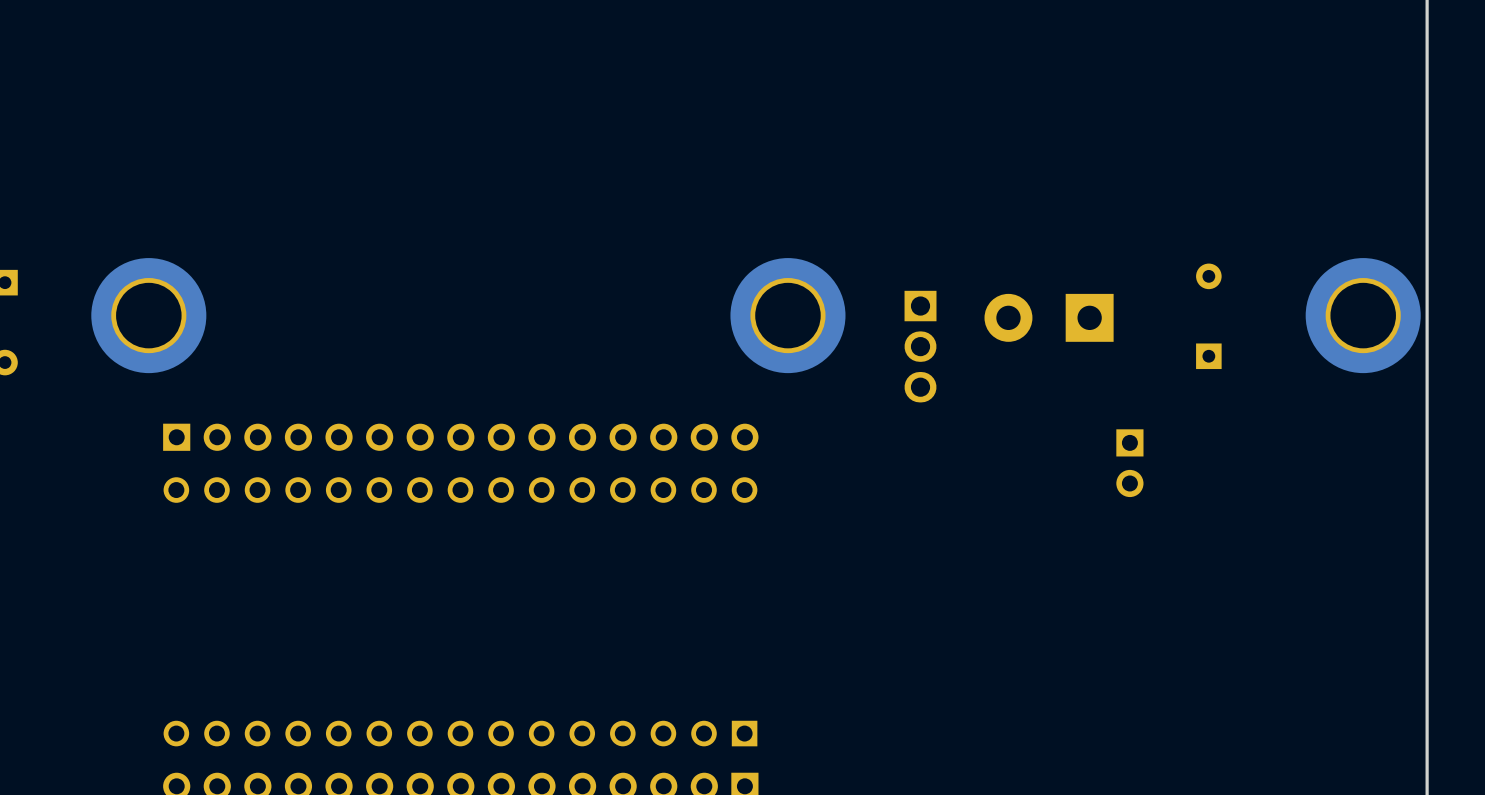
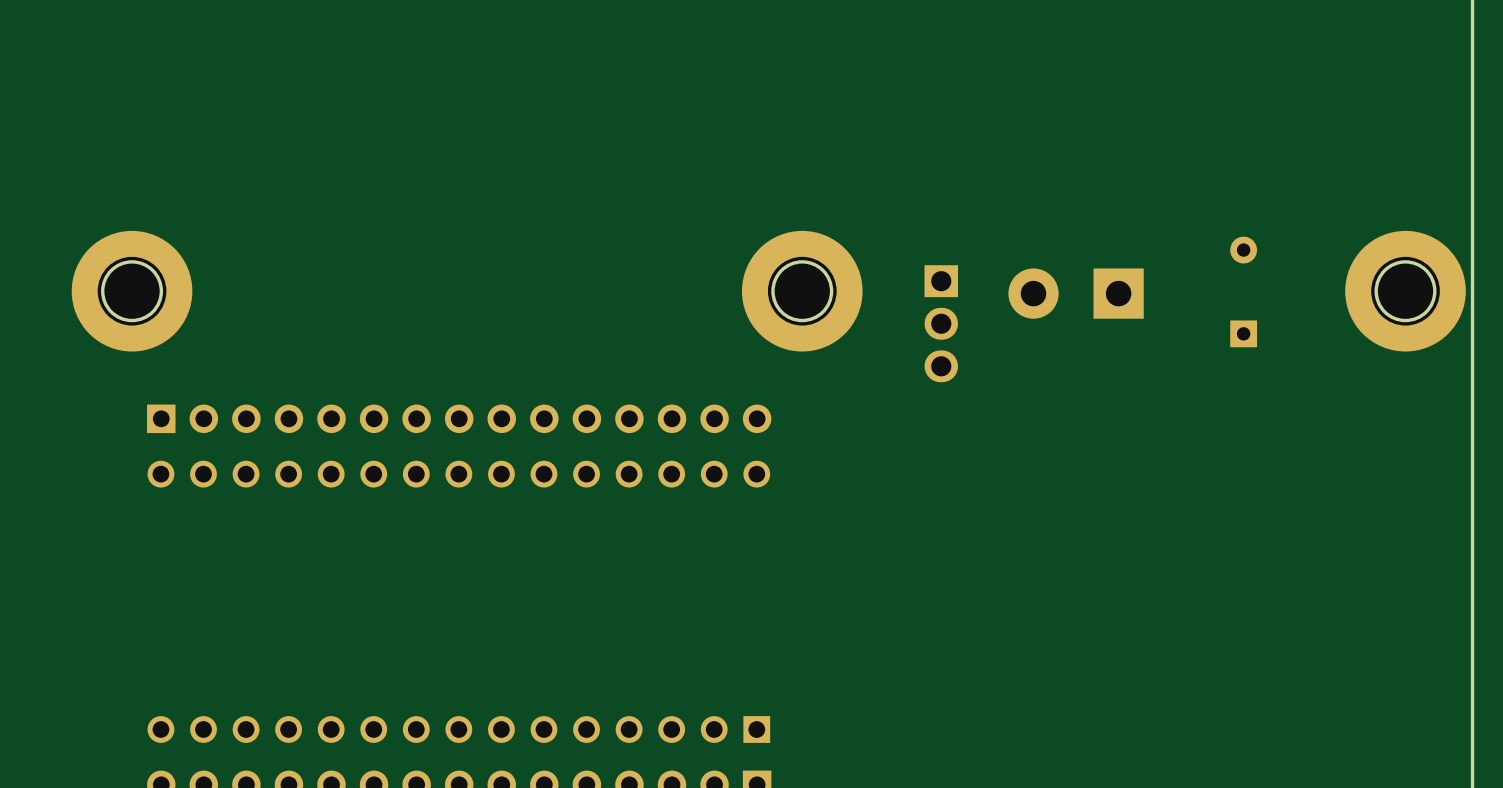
round board edge: none -> [101, 260, 164, 323]
round board edge: none -> [771, 260, 834, 323]
round board edge: none -> [1374, 260, 1437, 323]
part: (1129, 463) -> none

